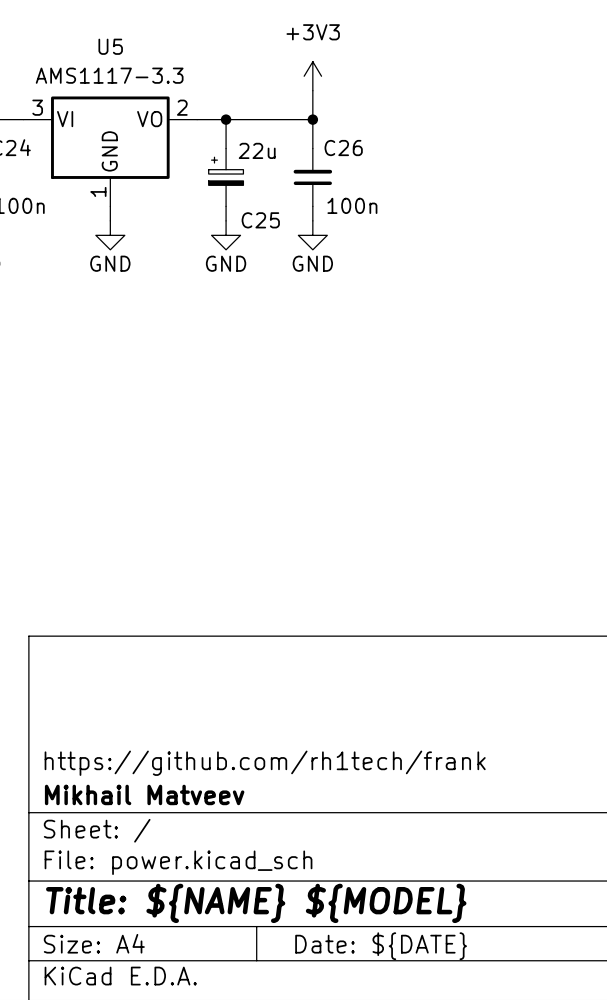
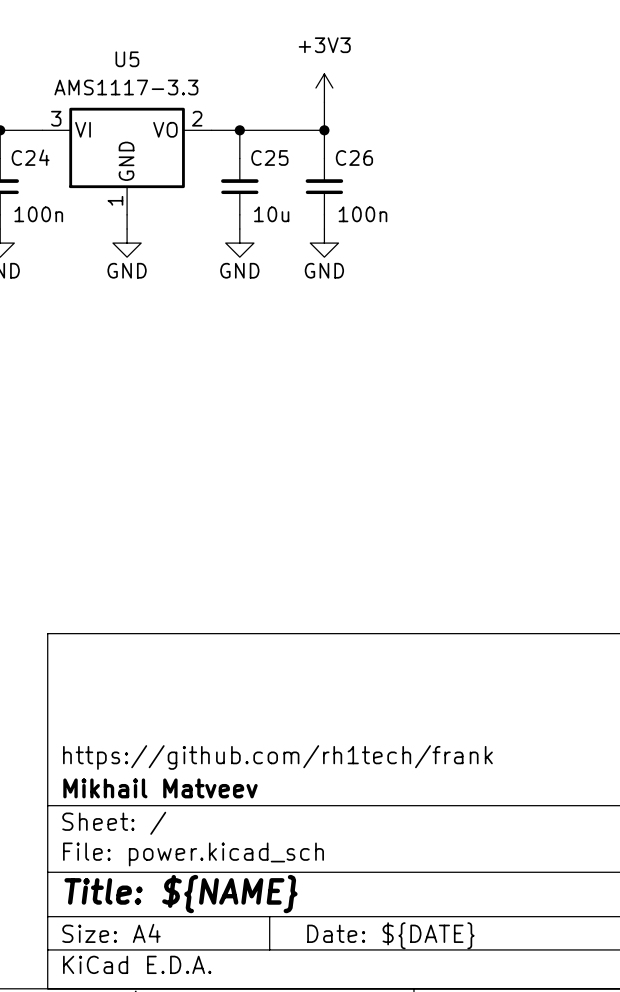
C25 symbol: [208, 148, 244, 207] -> [221, 158, 259, 215]
C25 value: 22u (257, 150) -> 10u (271, 214)
C25 name position: C25 (260, 220) -> C25 (269, 157)
title block: Title: ${NAME} ${MODEL} (256, 903) -> Title: ${NAME} (180, 894)

